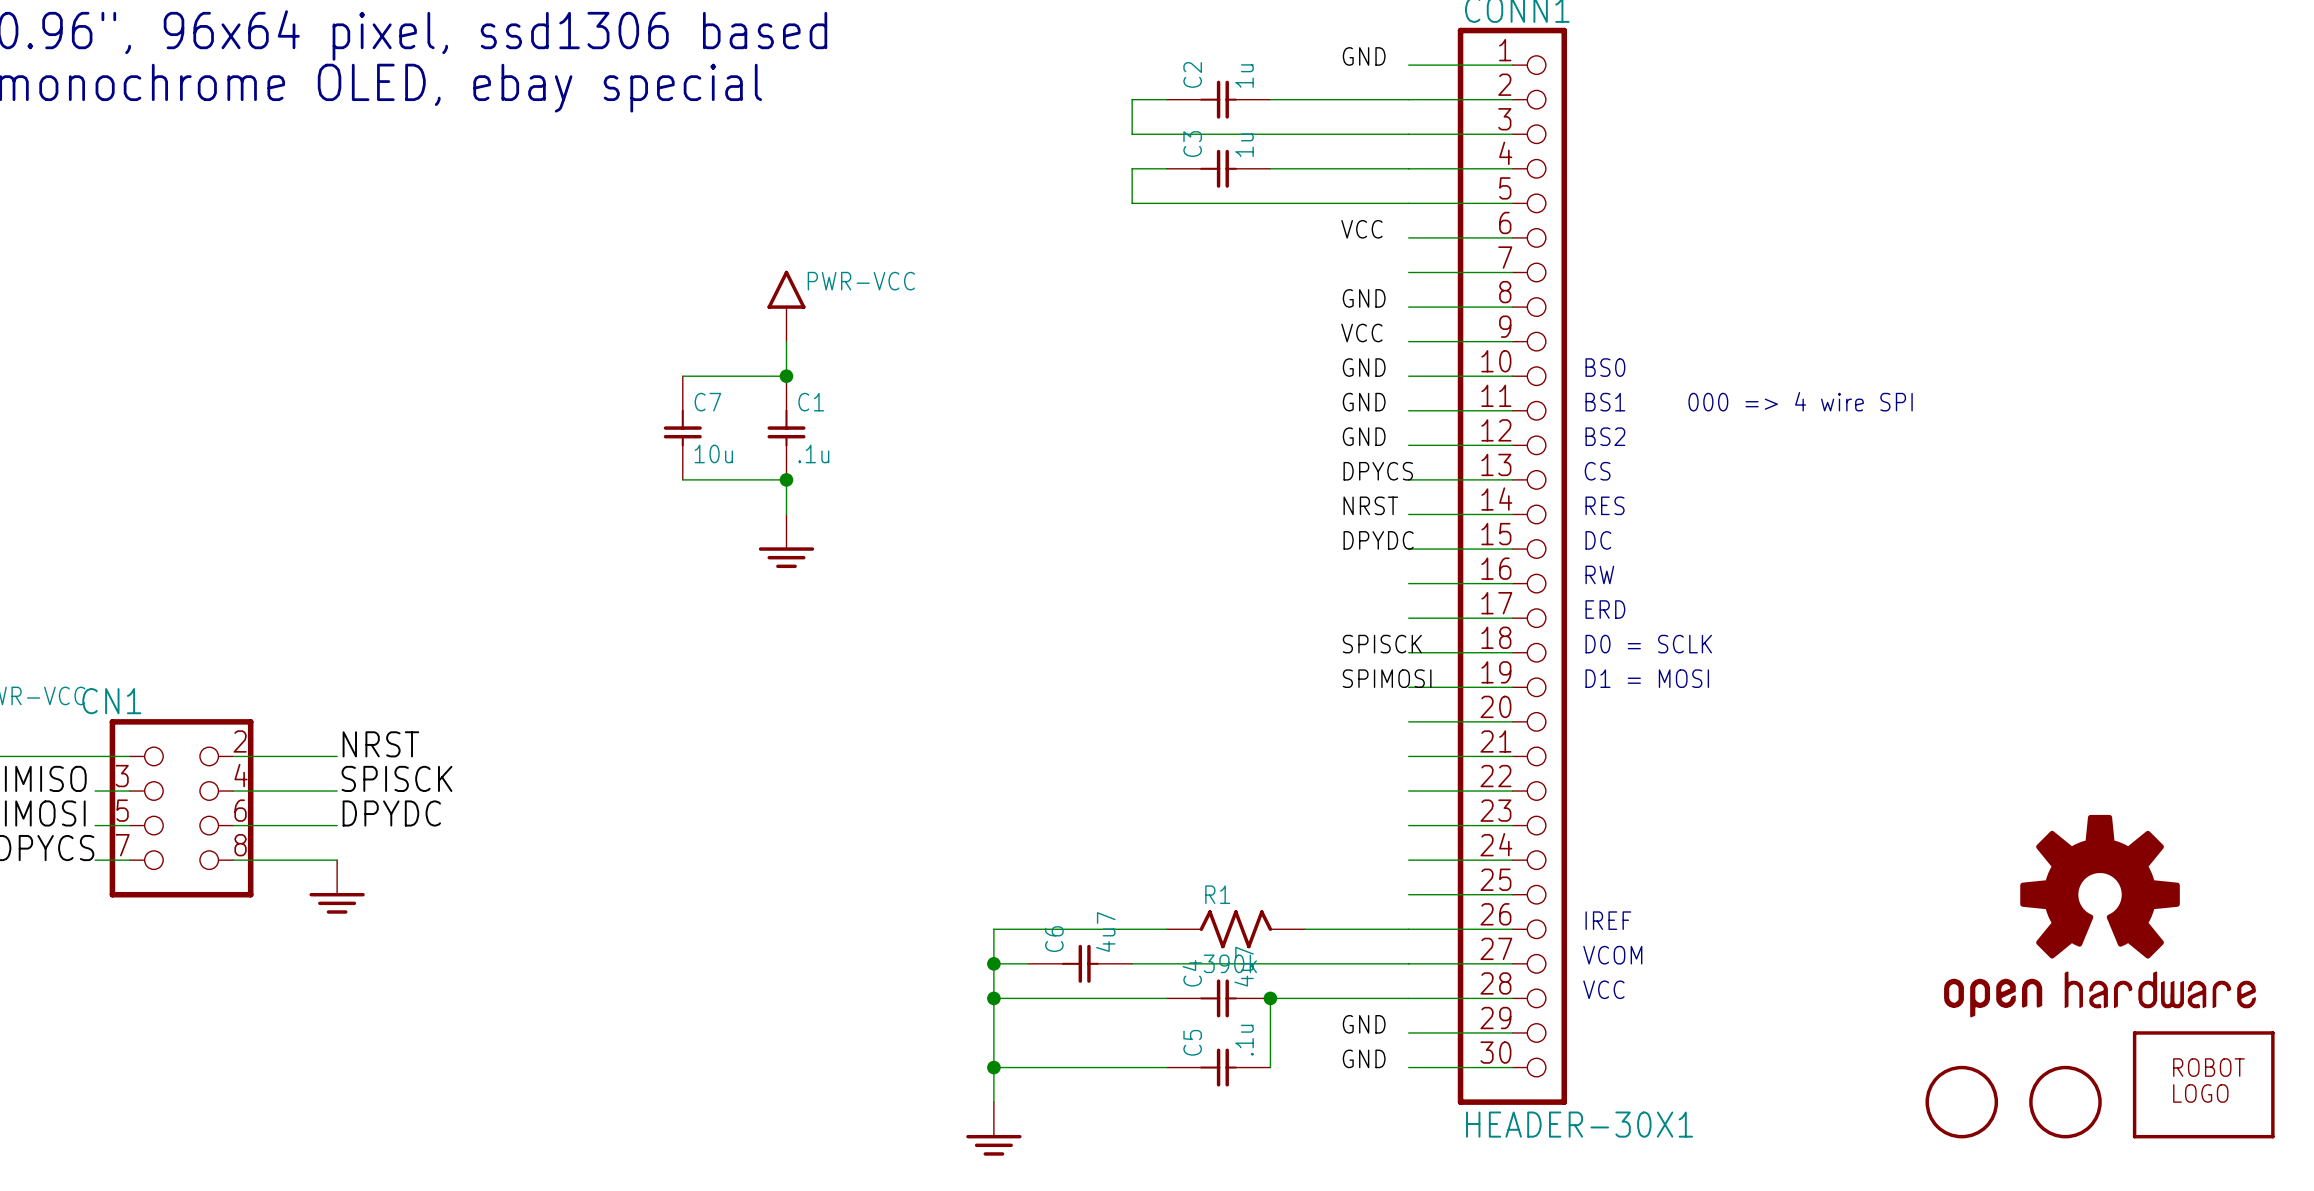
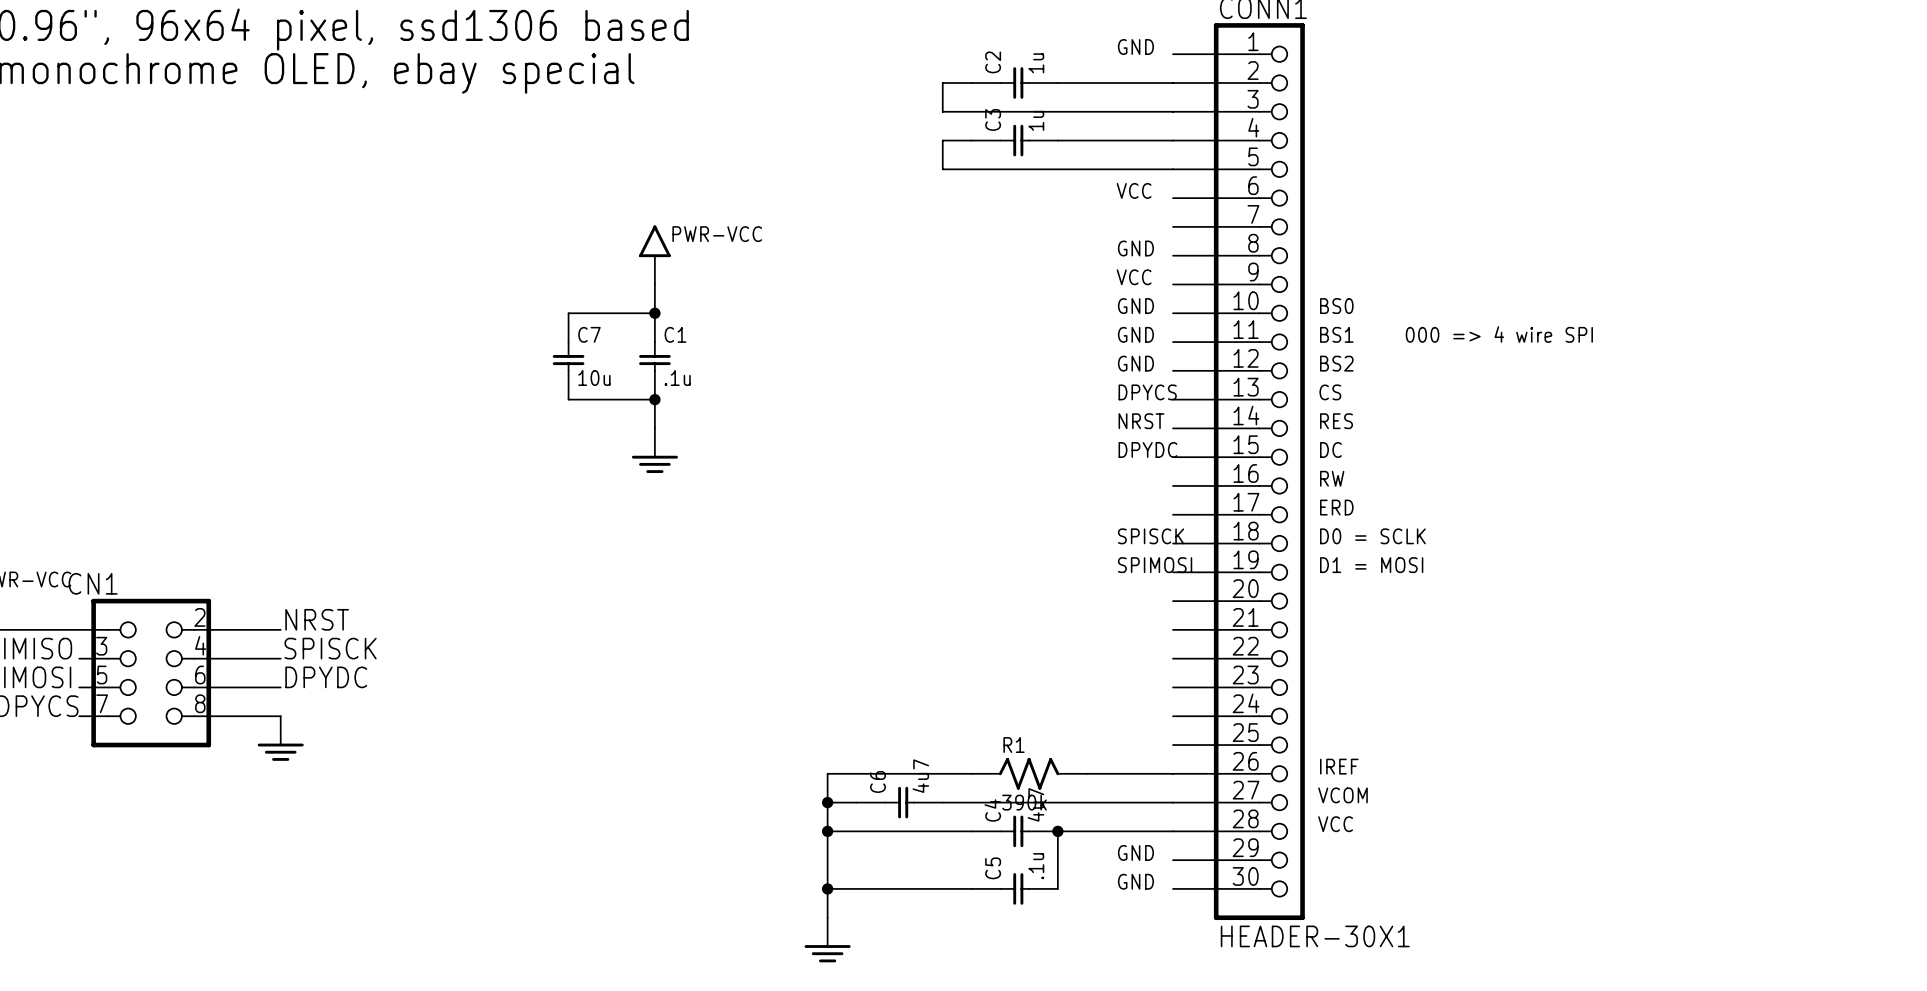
part: (2099, 916) -> none
part: (2203, 1084) -> none
part: (1961, 1102) -> none
part: (2065, 1102) -> none

